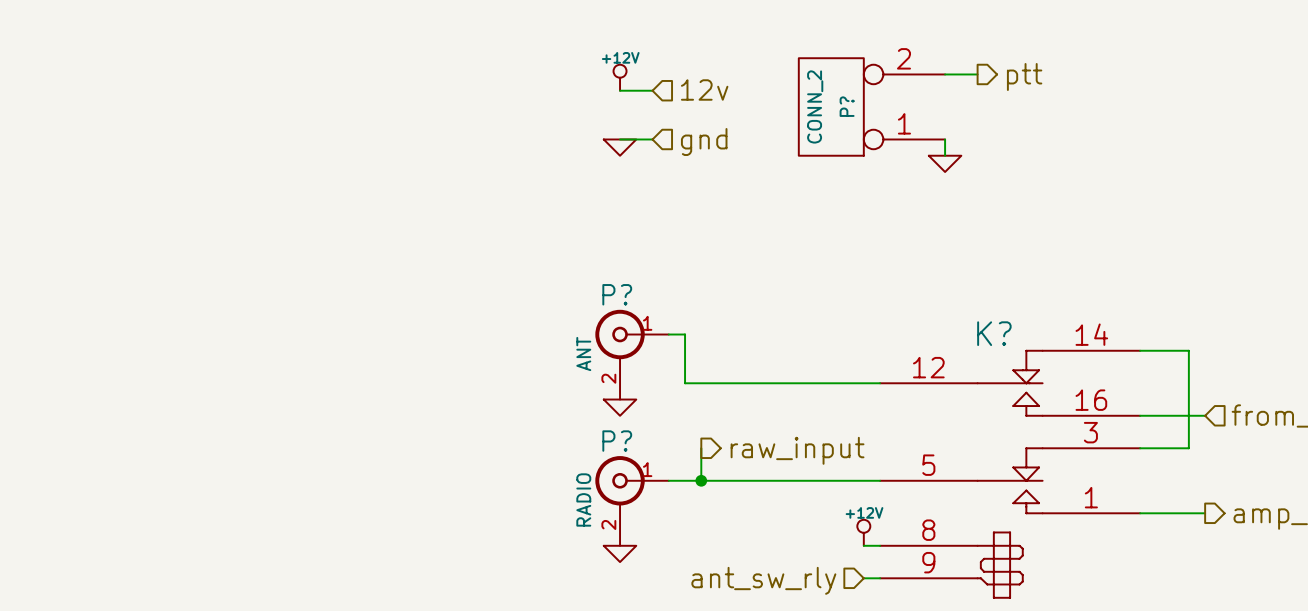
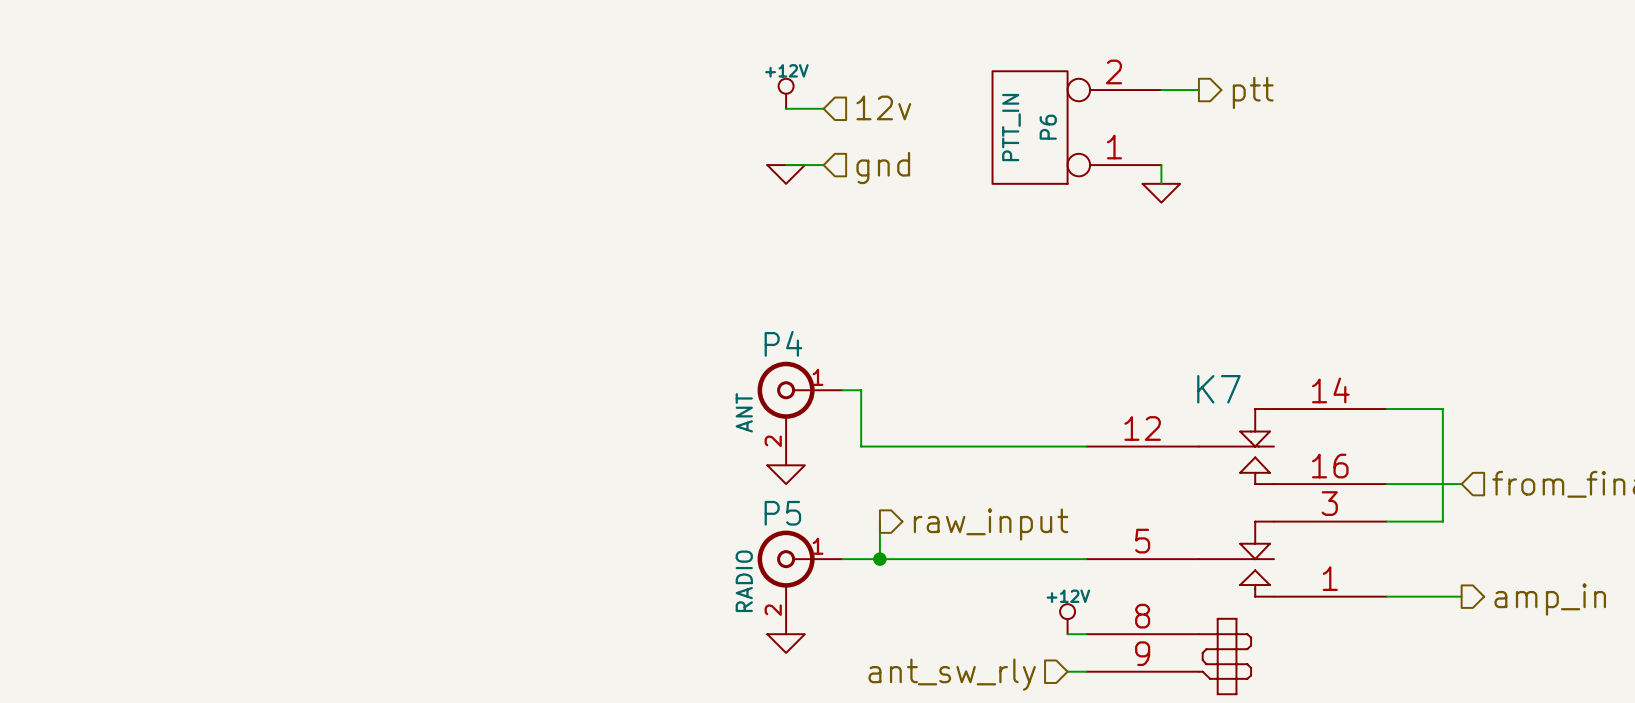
P? value: CONN_2 (815, 106) -> PTT_IN (1011, 127)
P? name: P? (847, 106) -> P6 (1048, 127)
P? name: P? (617, 294) -> P4 (783, 343)
K? name: K? (994, 333) -> K7 (1218, 389)
P? name: P? (617, 441) -> P5 (782, 513)

